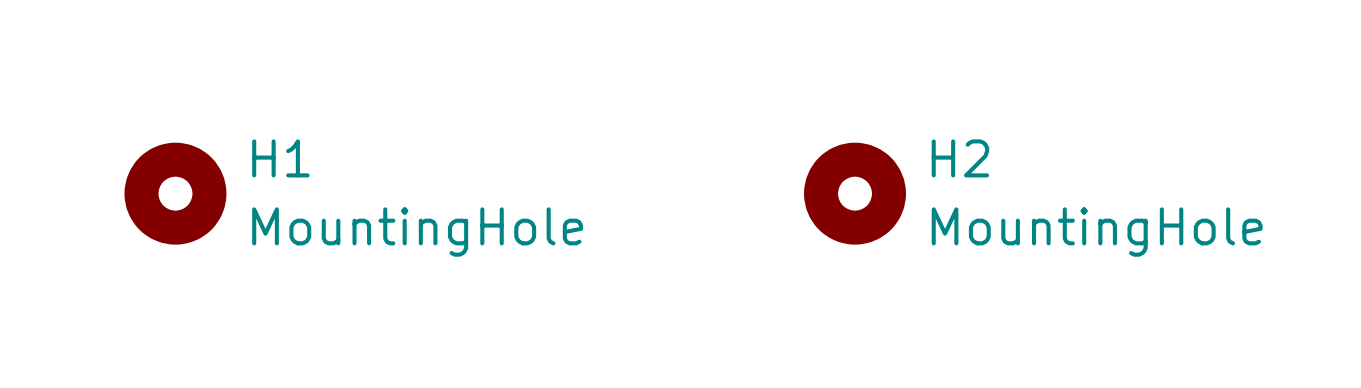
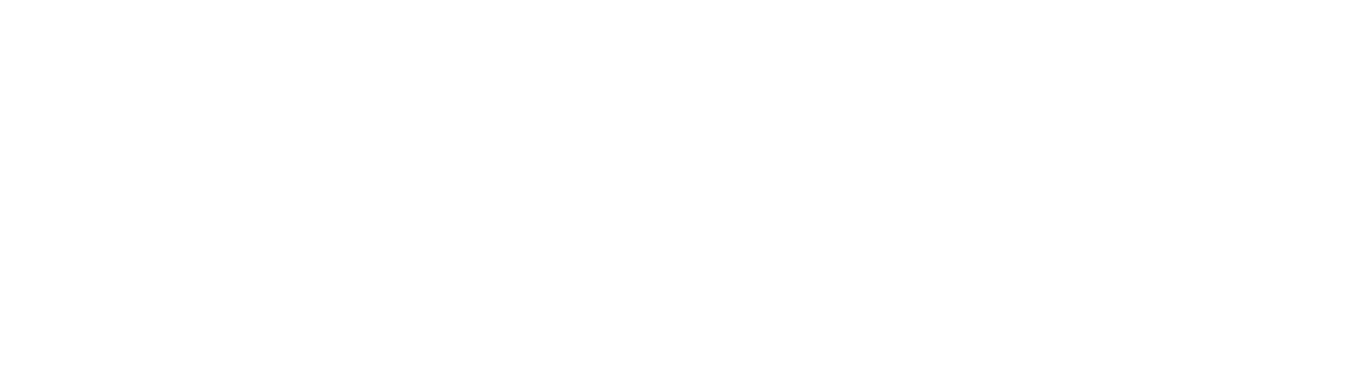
H1: MountingHole (175, 193) -> none
H2: MountingHole (855, 193) -> none

